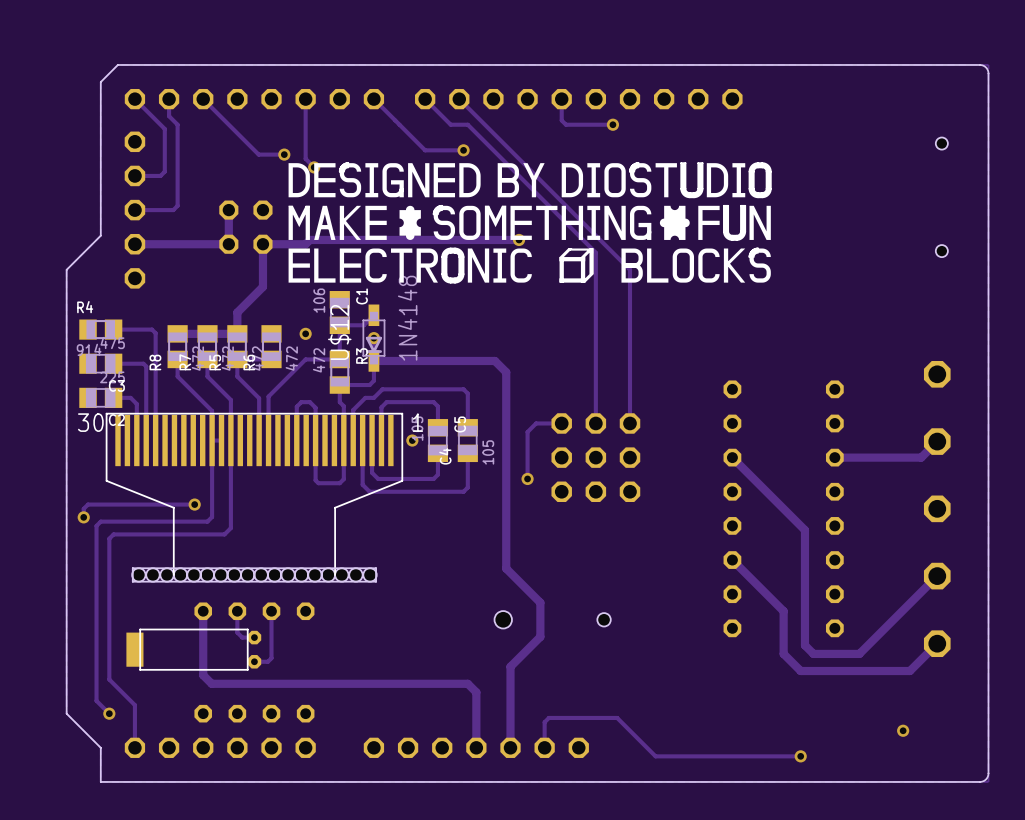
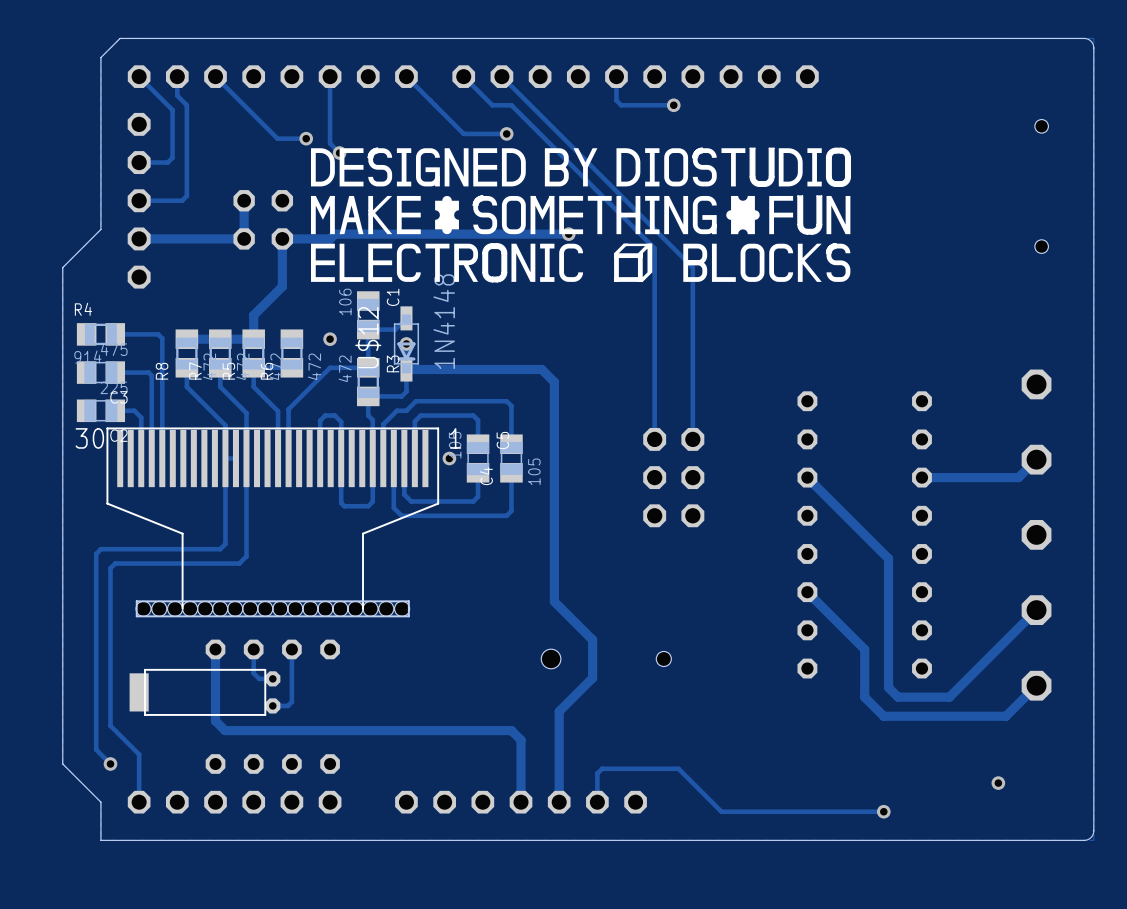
track: (561, 423) (536, 423) (527, 432) (527, 478) -> none
part: (561, 457) -> none
via: (527, 478) -> none
track: (194, 504) (87, 504) (83, 508) (83, 517) -> none
via: (194, 504) -> none
via: (83, 517) -> none

